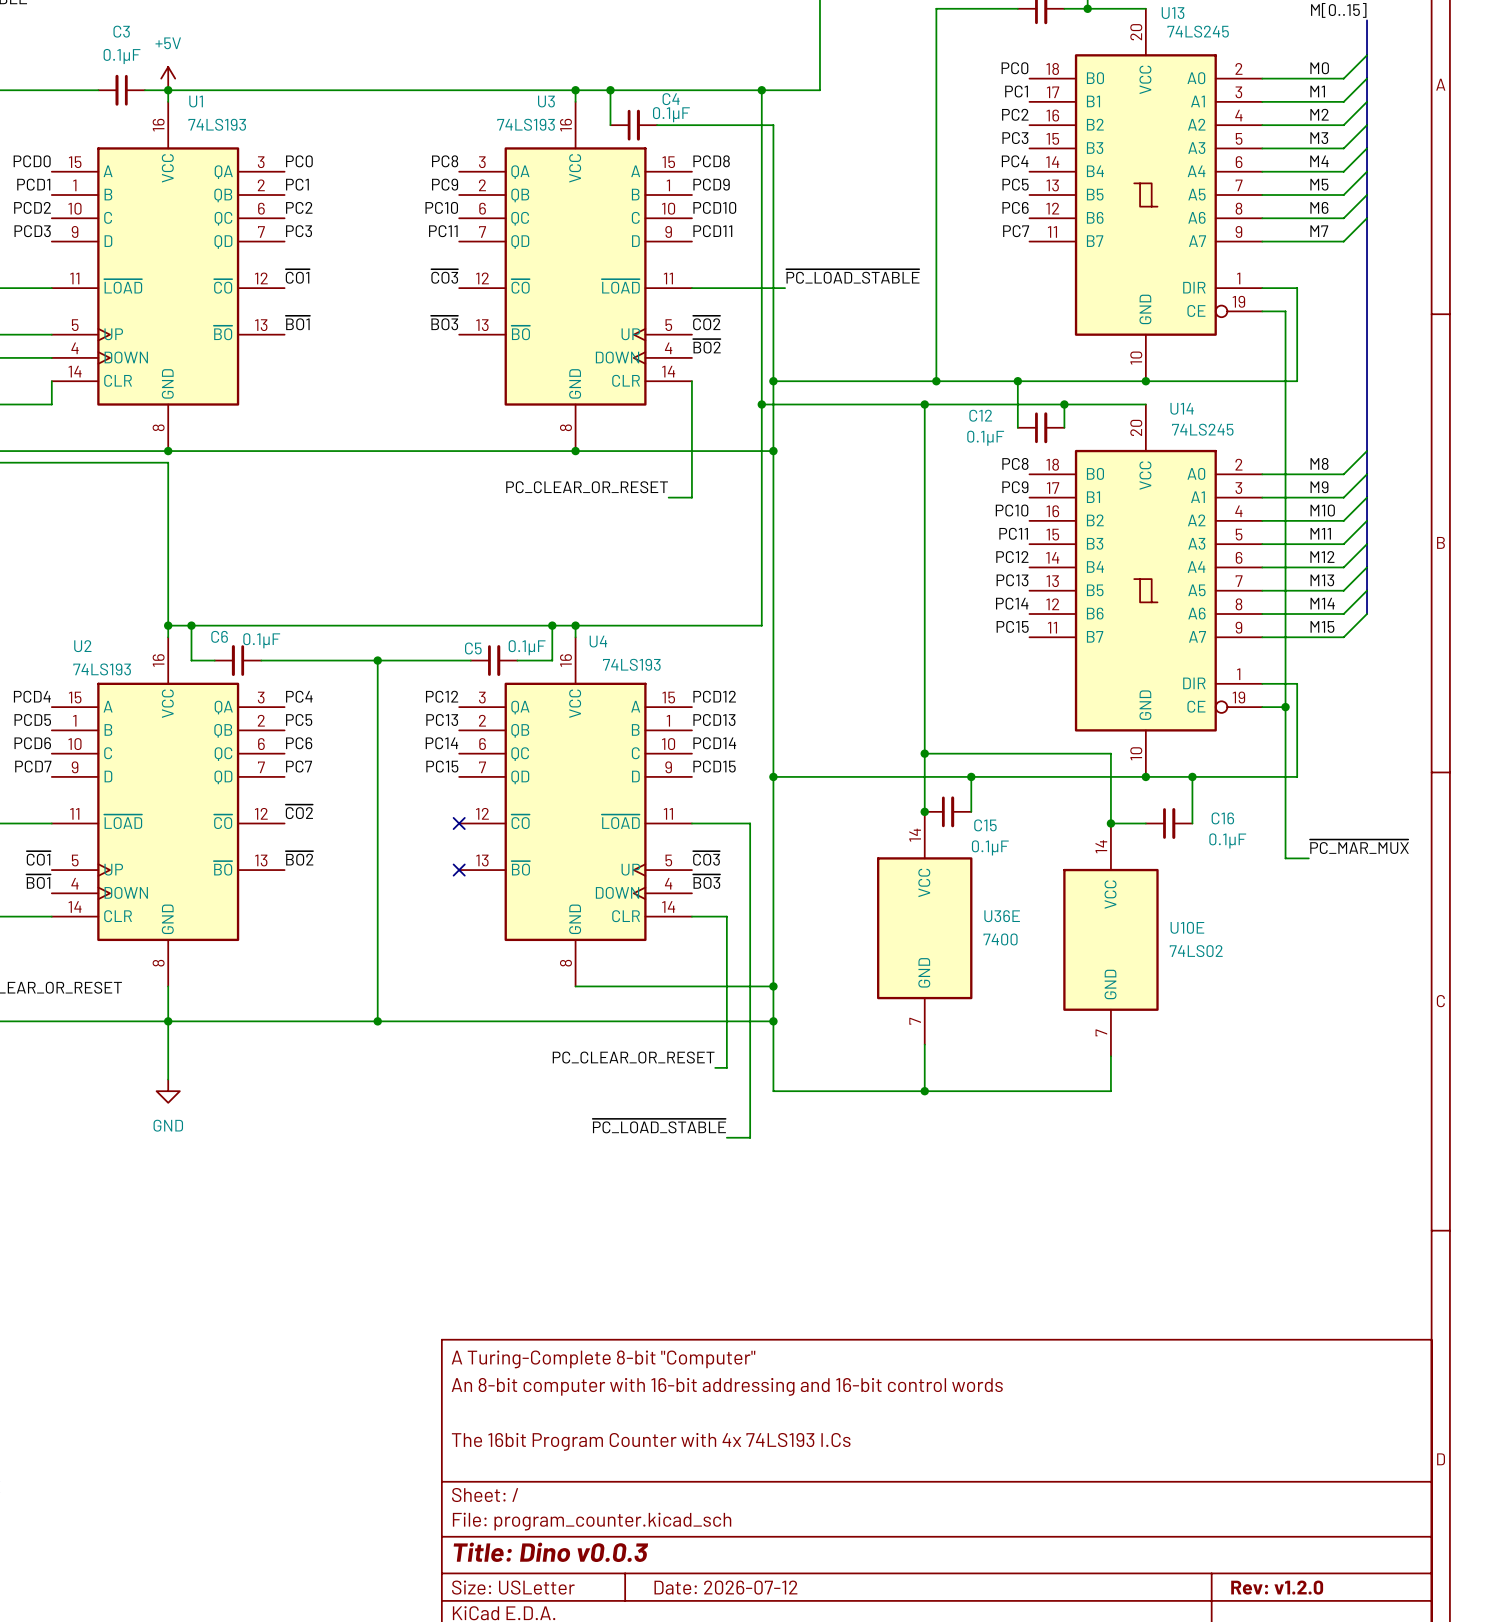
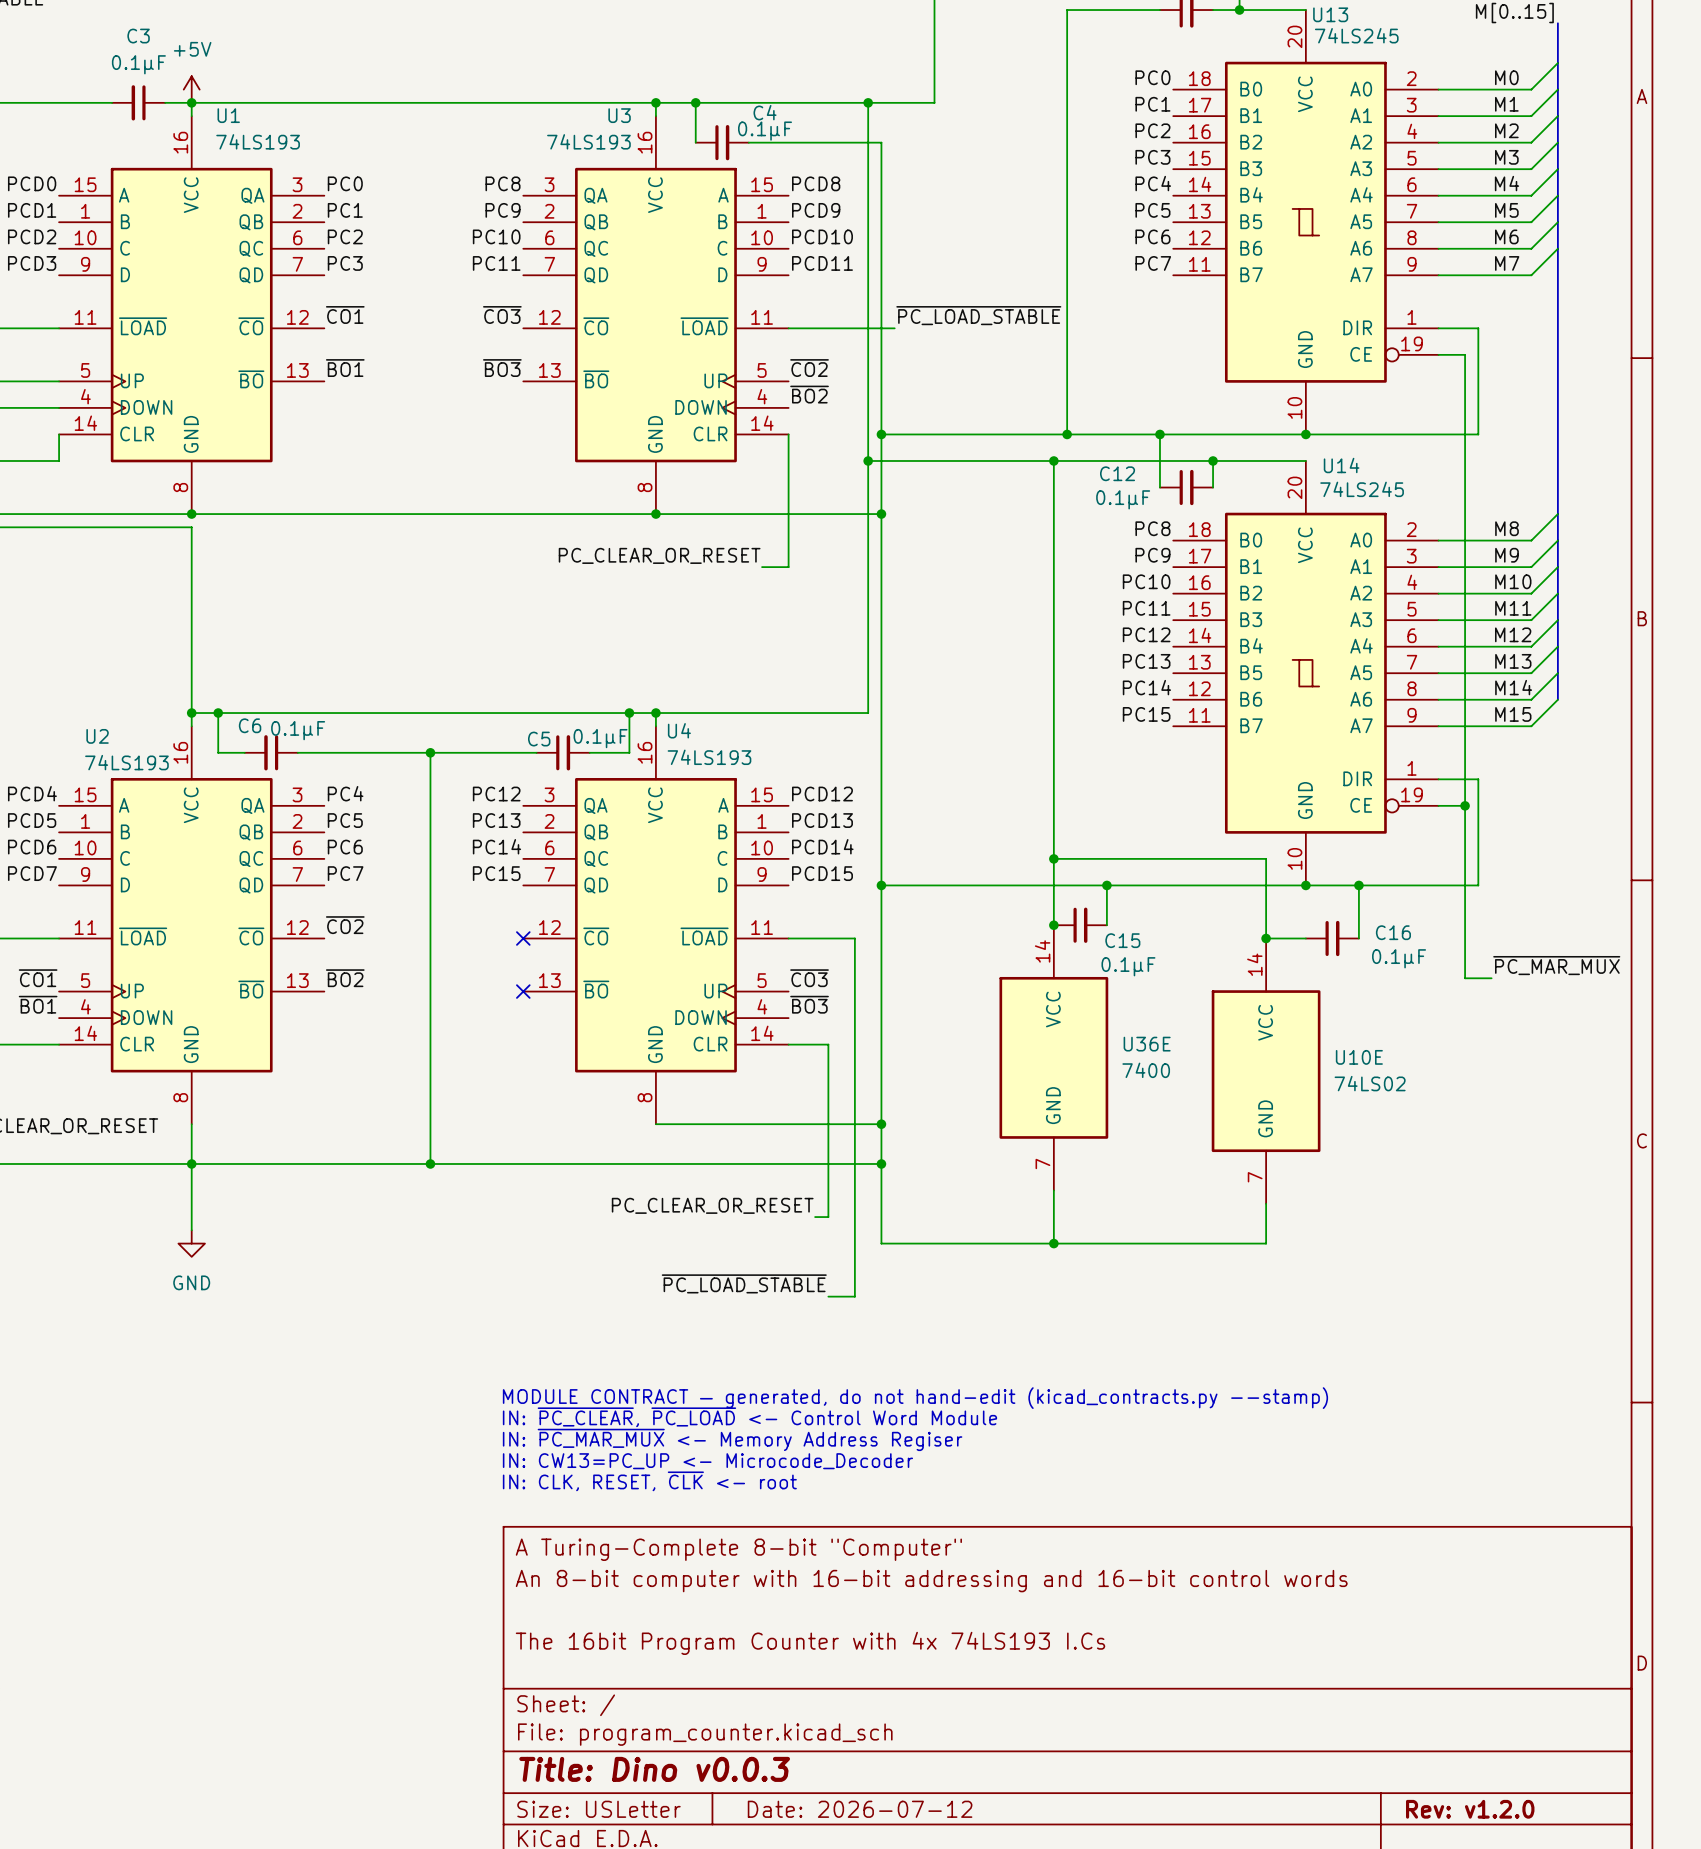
text: none -> MODULE CONTRACT — generated, do not hand-edit (kicad_contracts.py --stamp) (915, 1398)
text: none -> IN: ~{PC_CLEAR}, ~{PC_LOAD} <- Control Word Module (749, 1417)
text: none -> IN: ~{PC_MAR_MUX} <- Memory Address Regiser (732, 1439)
text: none -> IN: CW13=PC_UP <- Microcode_Decoder (707, 1461)
text: none -> IN: CLK, RESET, ~{CLK} <- root (649, 1481)

